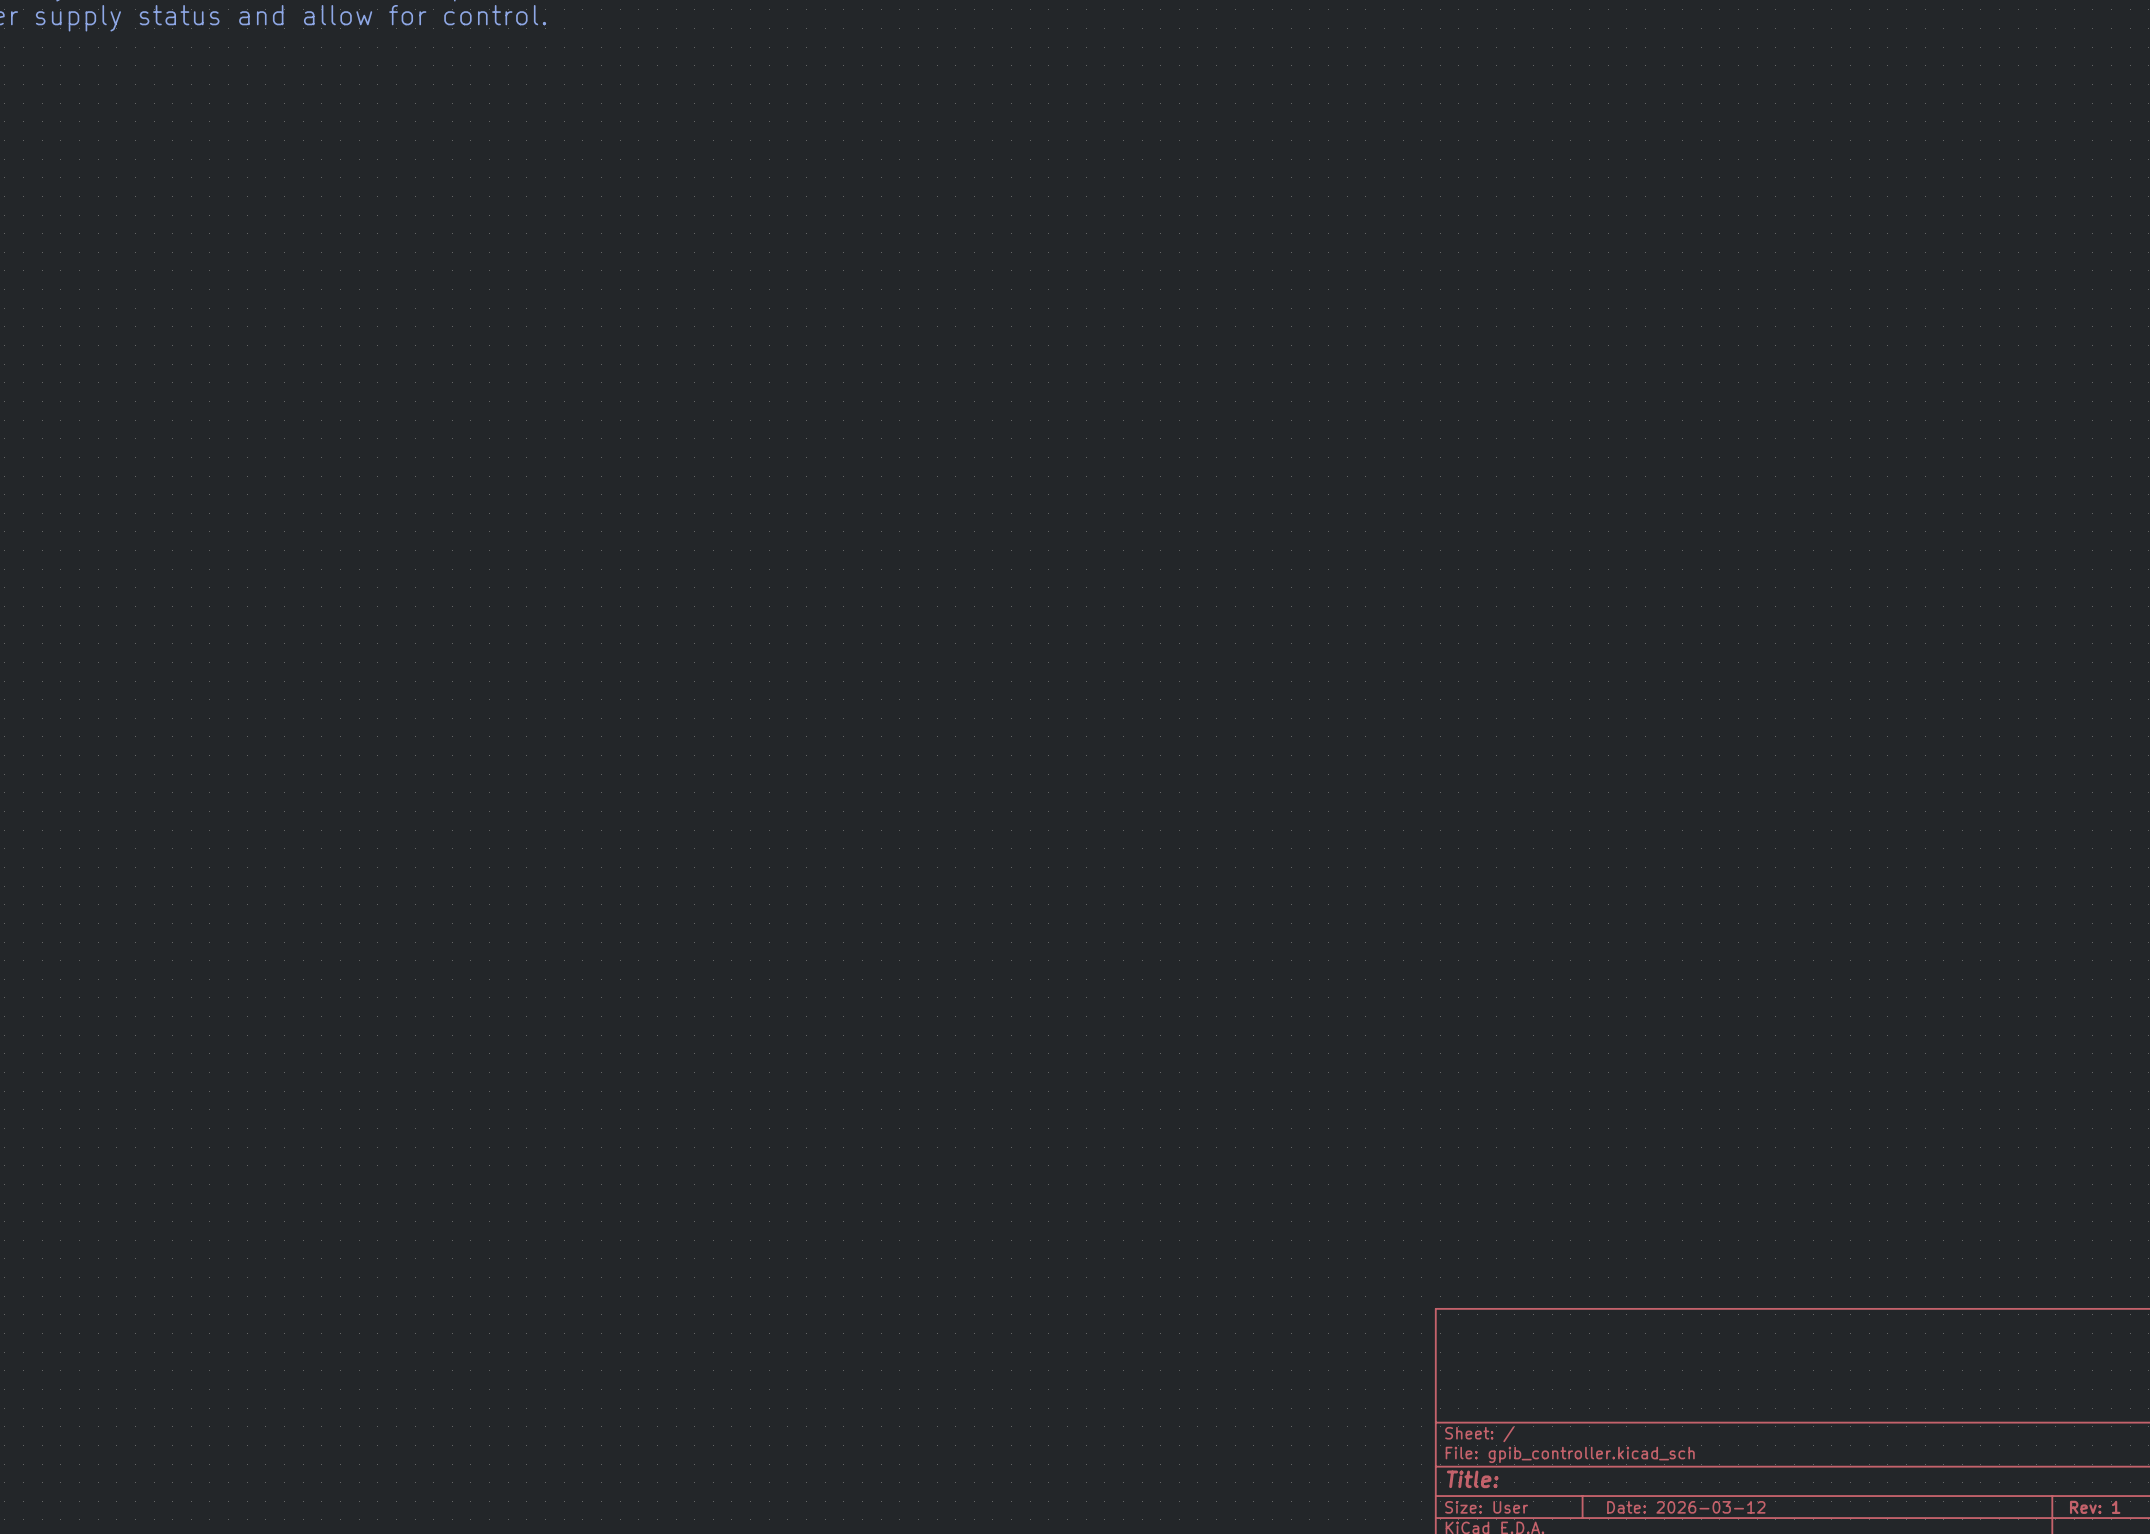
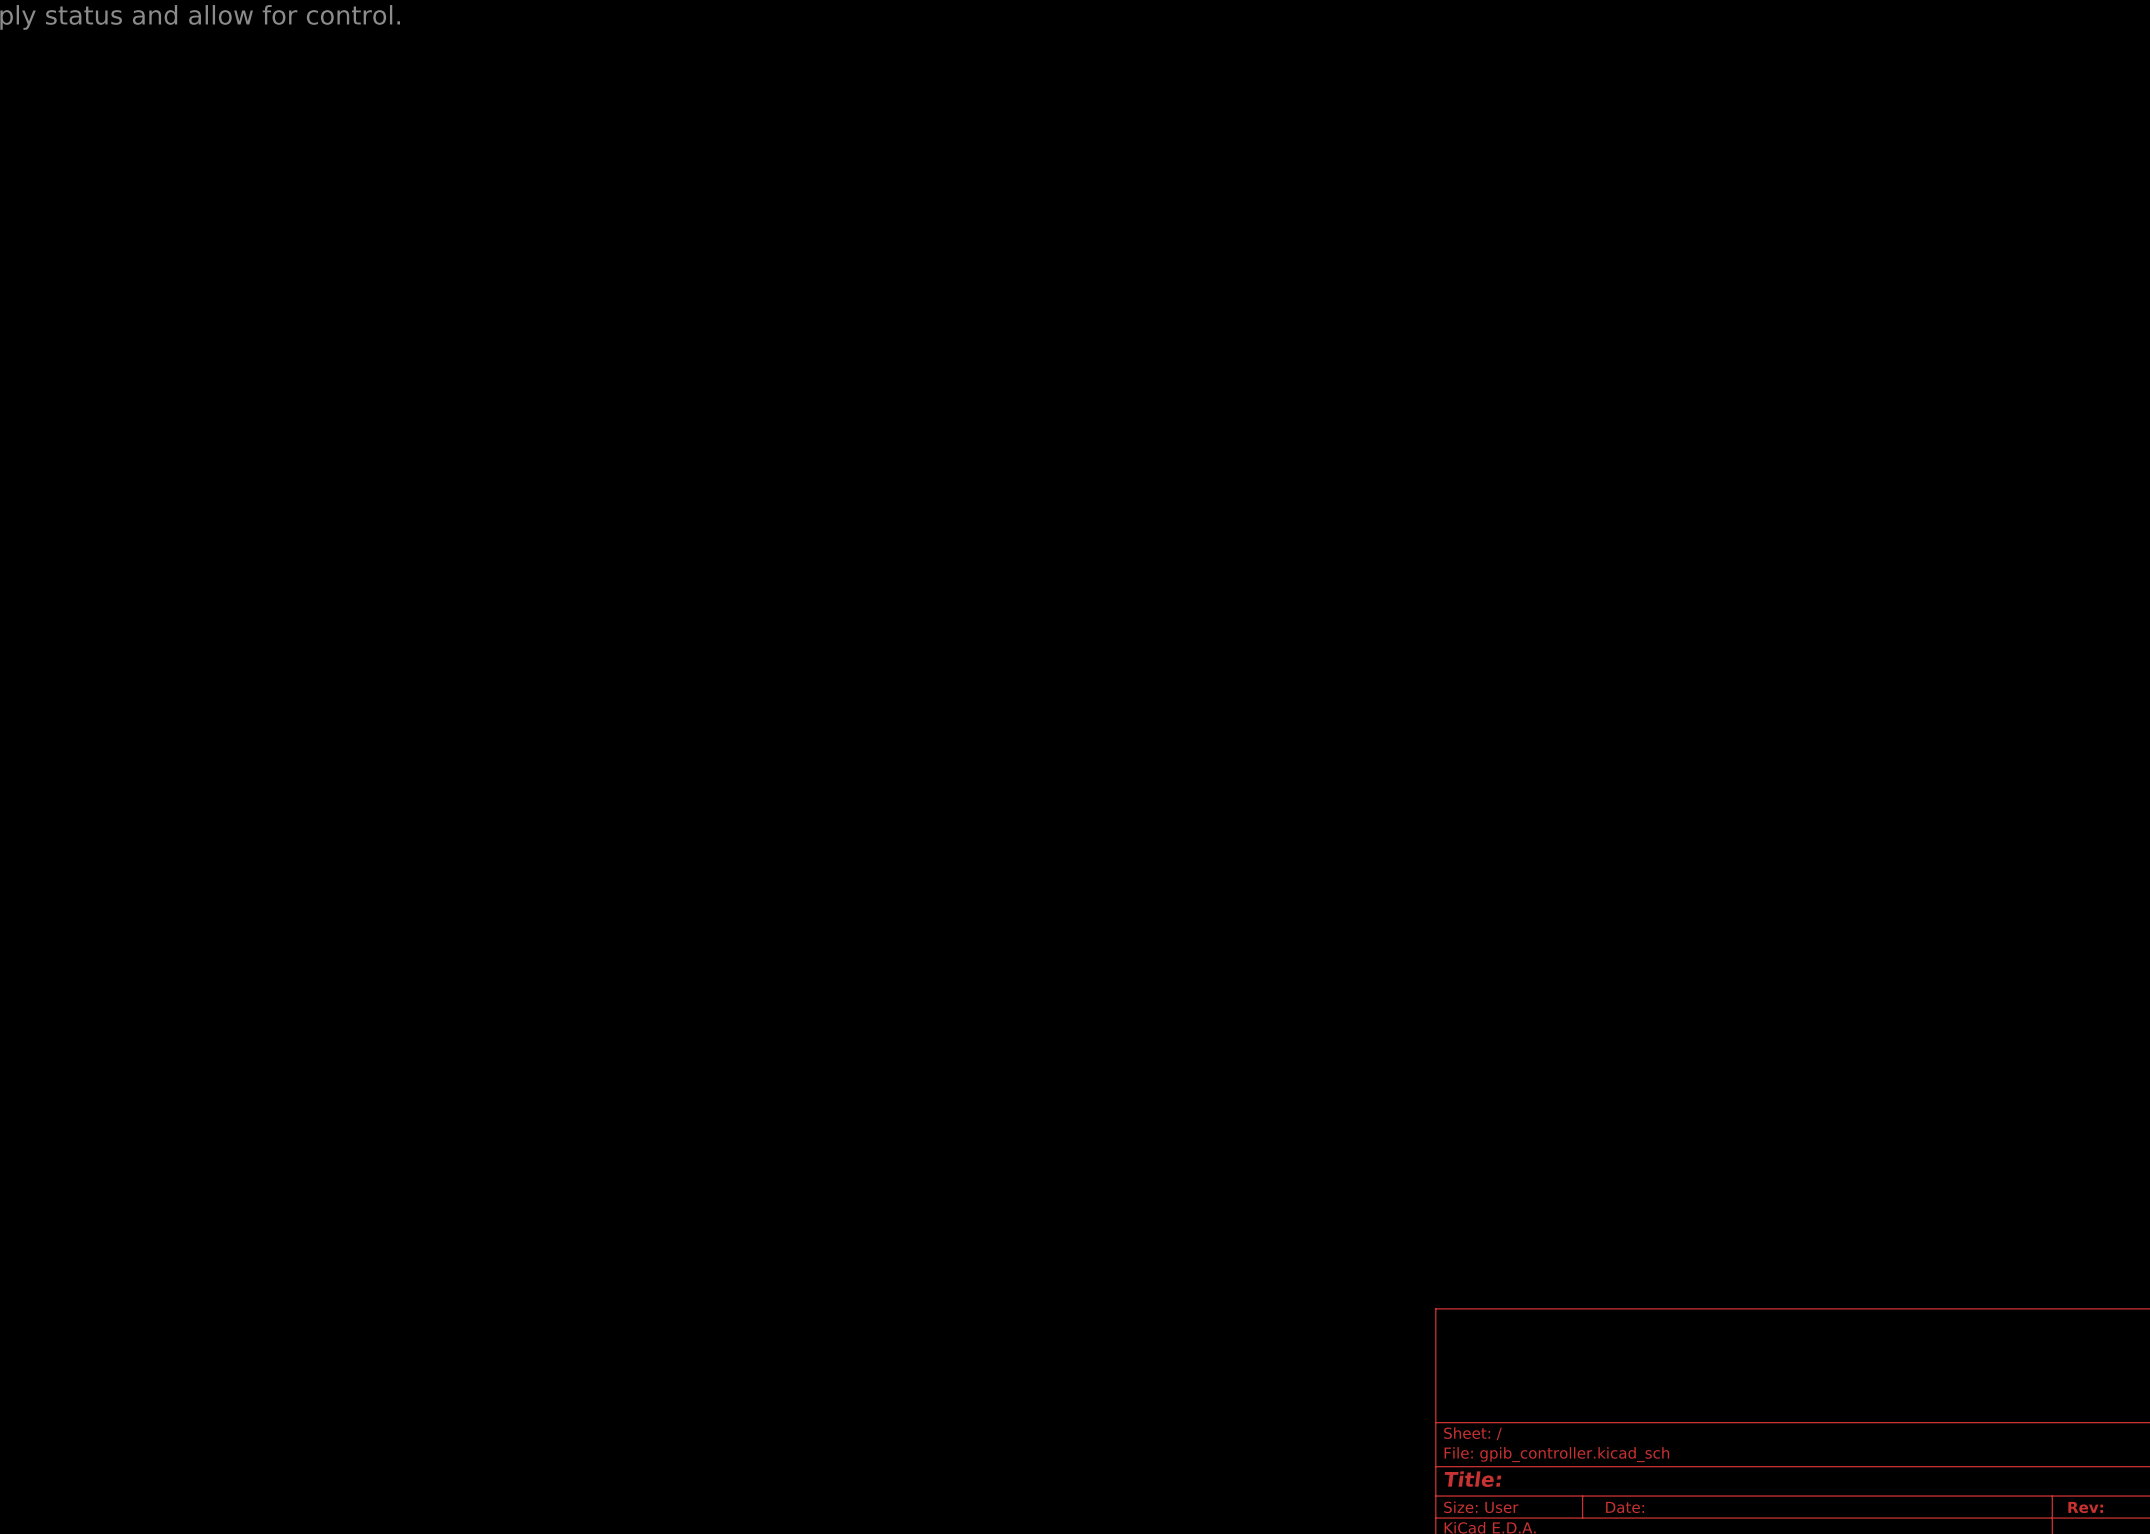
title block: Date: 2026-03-12 (1686, 1507) -> Date: (1625, 1507)
title block: Rev: 1 (2095, 1507) -> Rev: (2085, 1507)

